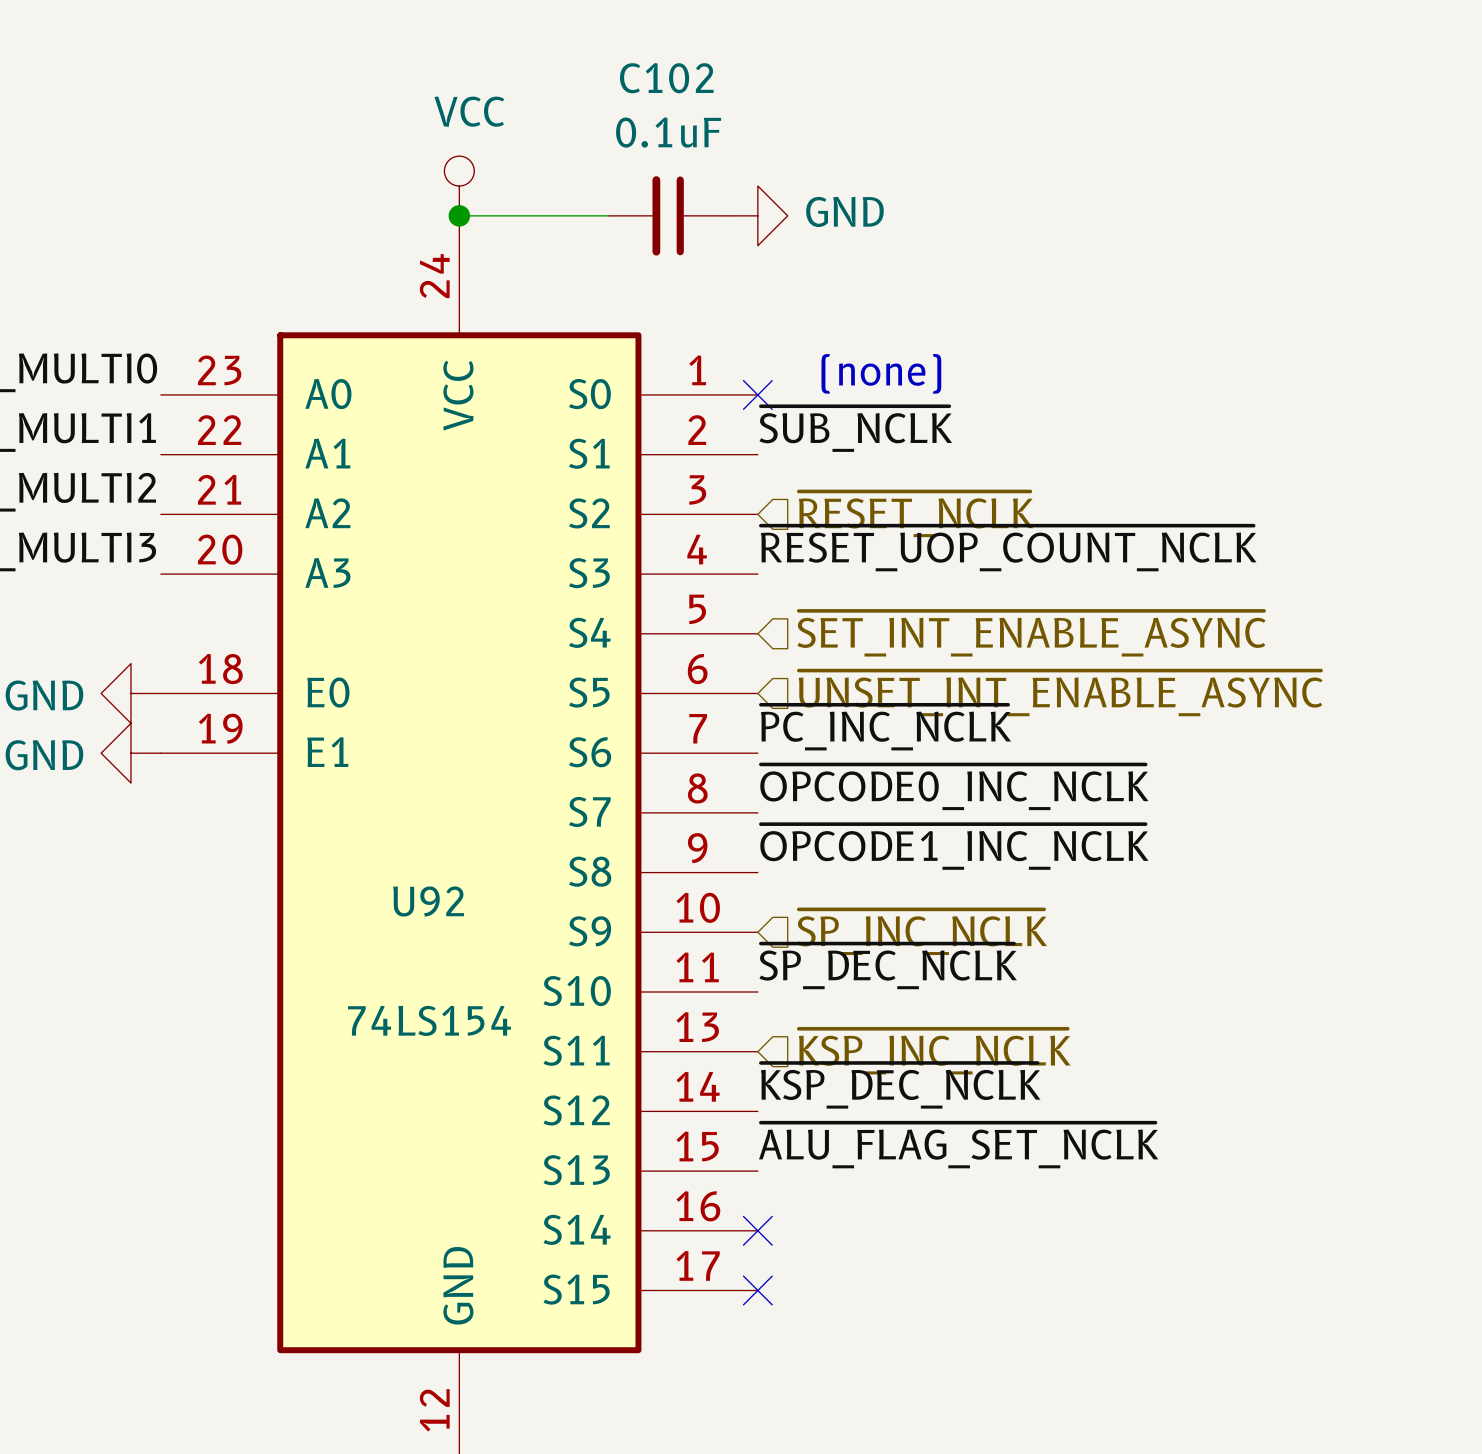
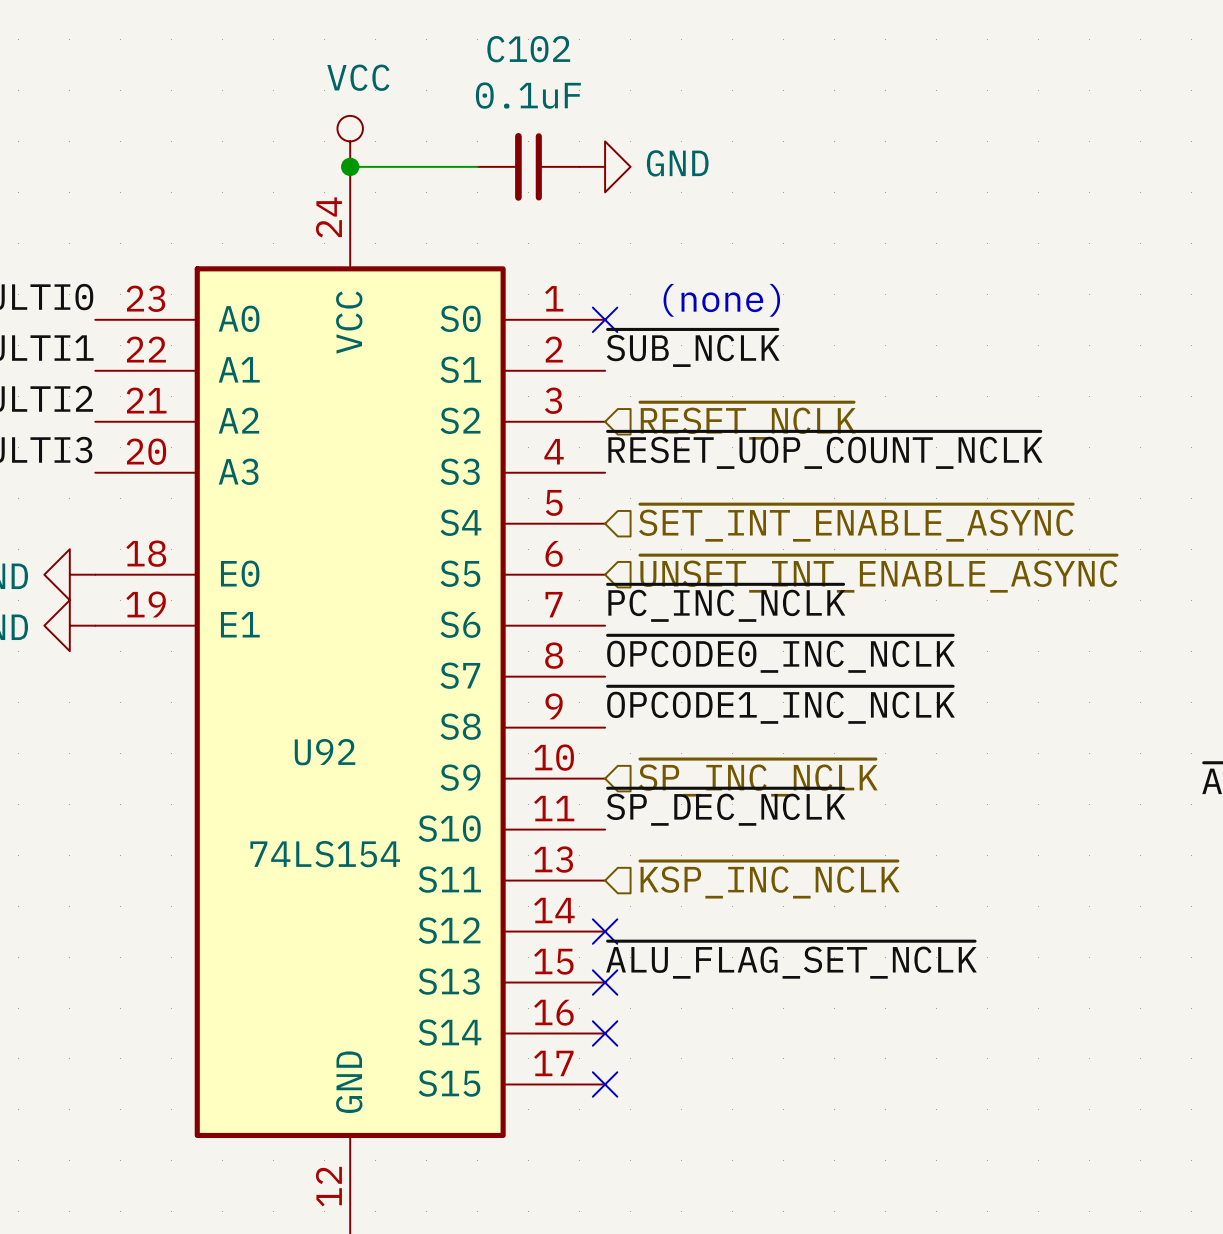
label: ~{KSP_DEC_NCLK} (900, 1085) -> none
no-connect mark: none -> (605, 931)
no-connect mark: none -> (605, 982)

